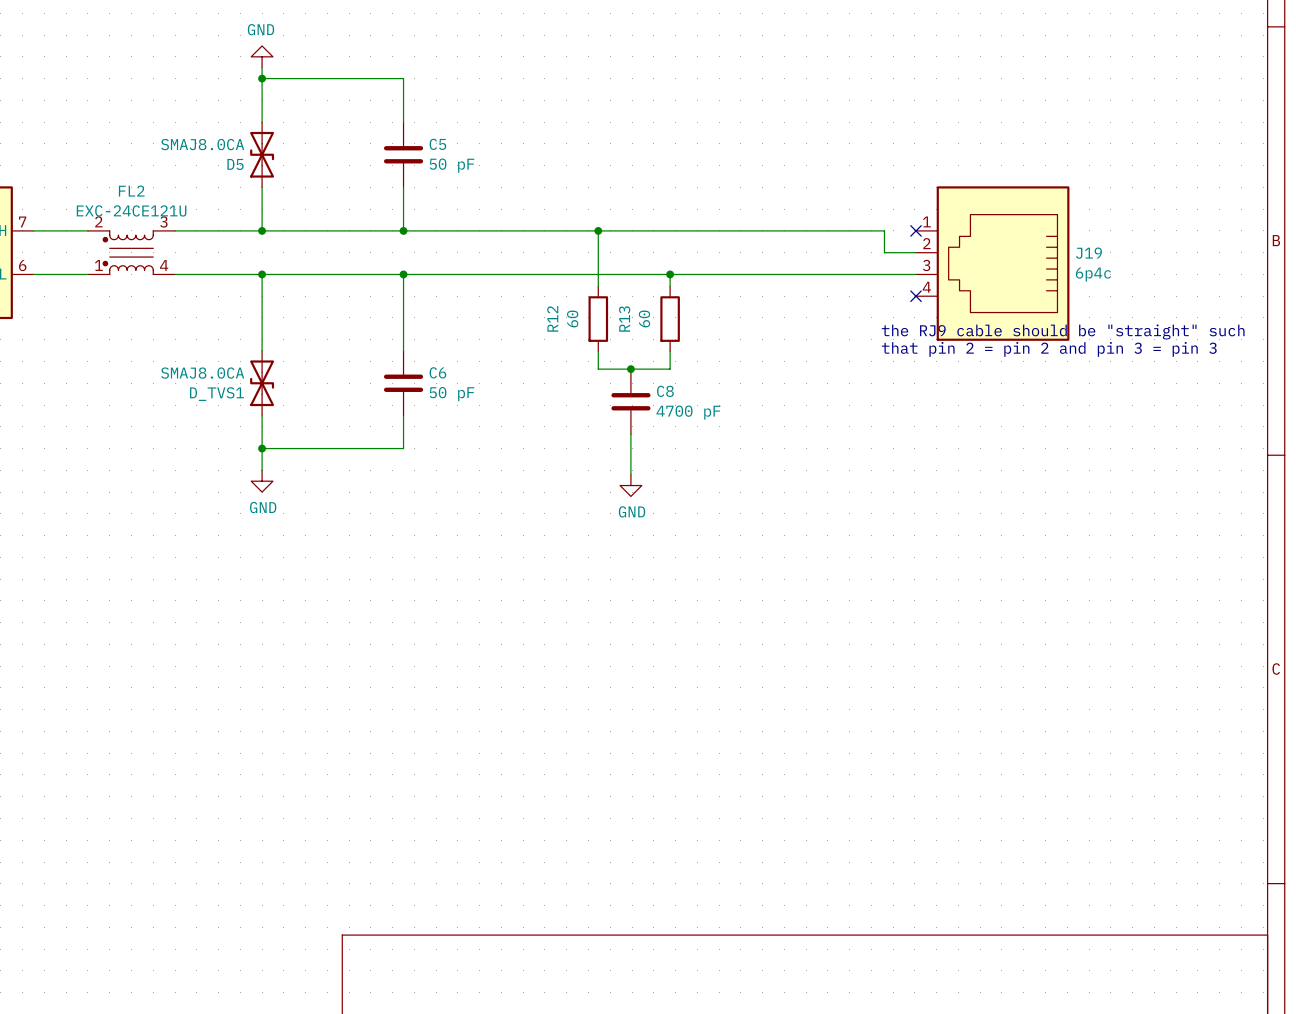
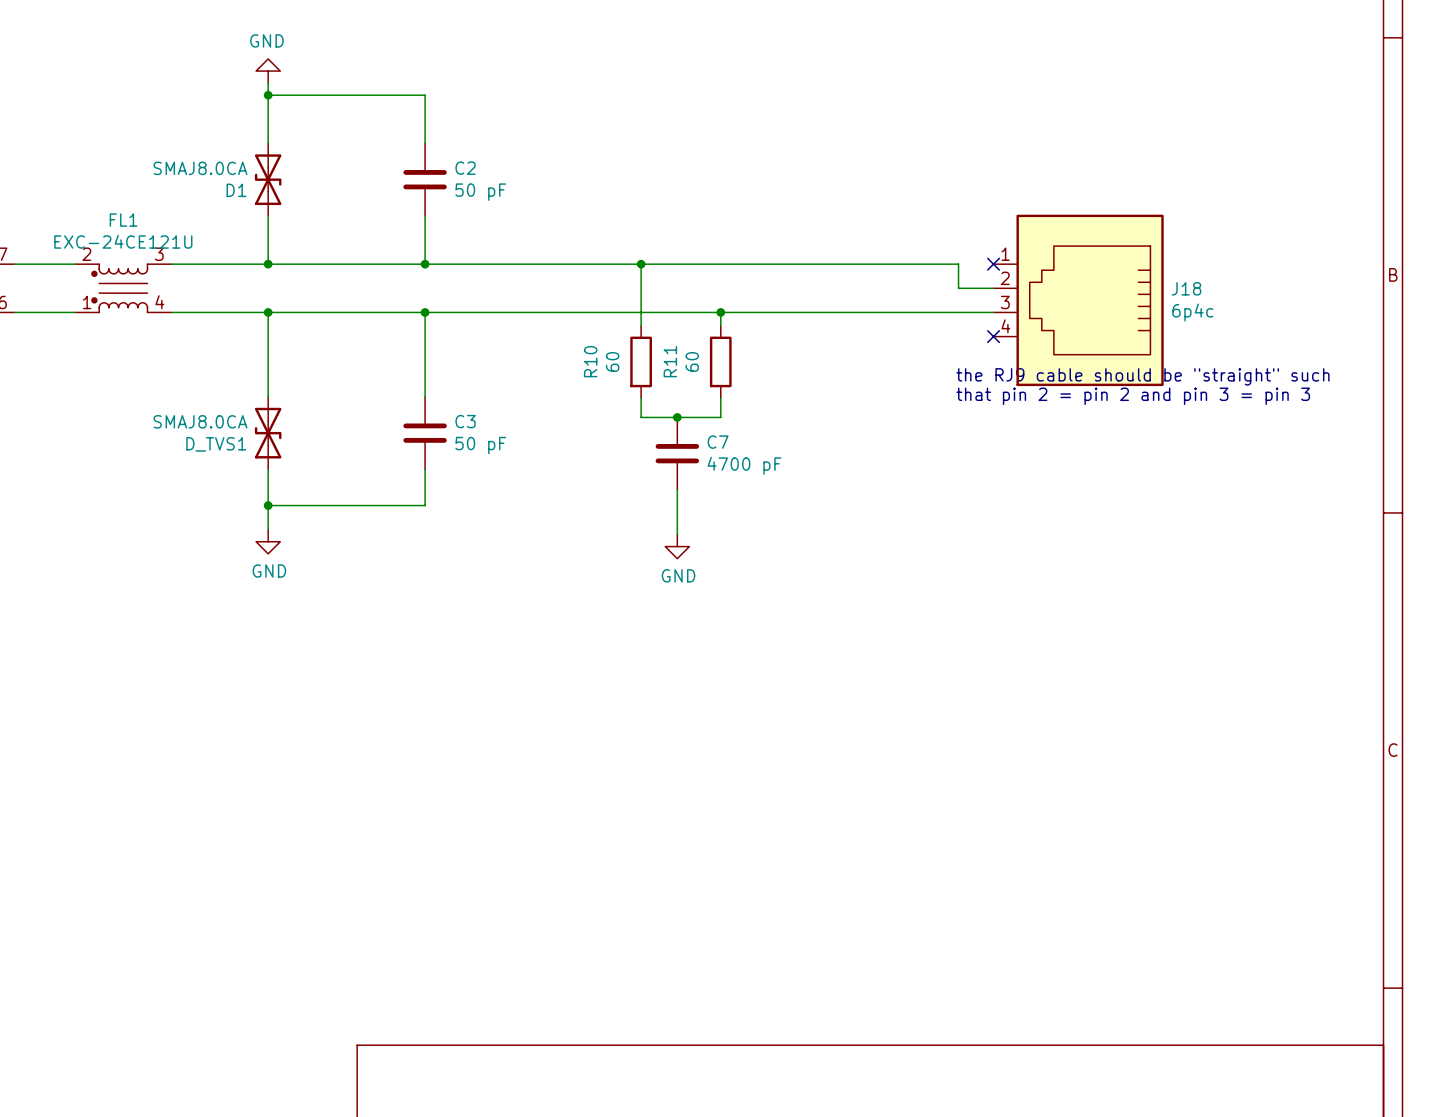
C5 name: C5 (437, 144) -> C2 (465, 168)
D5 name: D5 (235, 164) -> D1 (236, 190)
FL2 name: FL2 (131, 191) -> FL1 (123, 220)
J19 name: J19 (1088, 253) -> J18 (1186, 288)
R12 name: R12 (552, 318) -> R10 (590, 361)
R13 name: R13 (624, 319) -> R11 (670, 361)
C6 name: C6 (437, 372) -> C3 (465, 421)
C8 name: C8 (665, 391) -> C7 (718, 442)

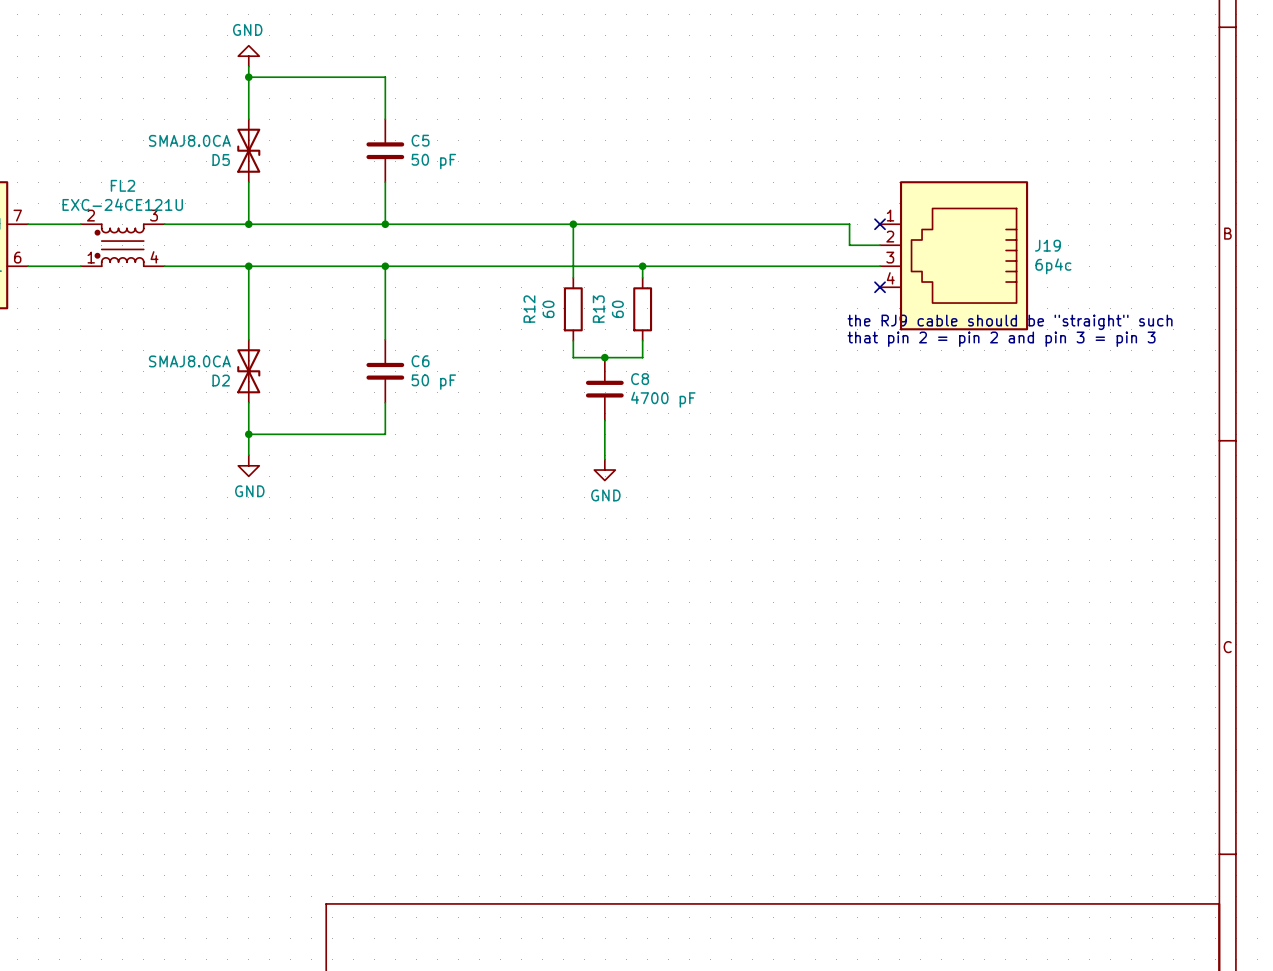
C2 name: C2 (465, 168) -> C5 (420, 140)
D1 name: D1 (236, 190) -> D5 (221, 159)
FL1 name: FL1 (123, 220) -> FL2 (122, 185)
J18 name: J18 (1186, 288) -> J19 (1047, 245)
R10 name: R10 (590, 361) -> R12 (529, 309)
R11 name: R11 (670, 361) -> R13 (598, 309)
C3 name: C3 (465, 421) -> C6 (420, 361)
C7 name: C7 (718, 442) -> C8 (640, 379)
D_TVS1 name: D_TVS1 (216, 444) -> D2 (221, 380)

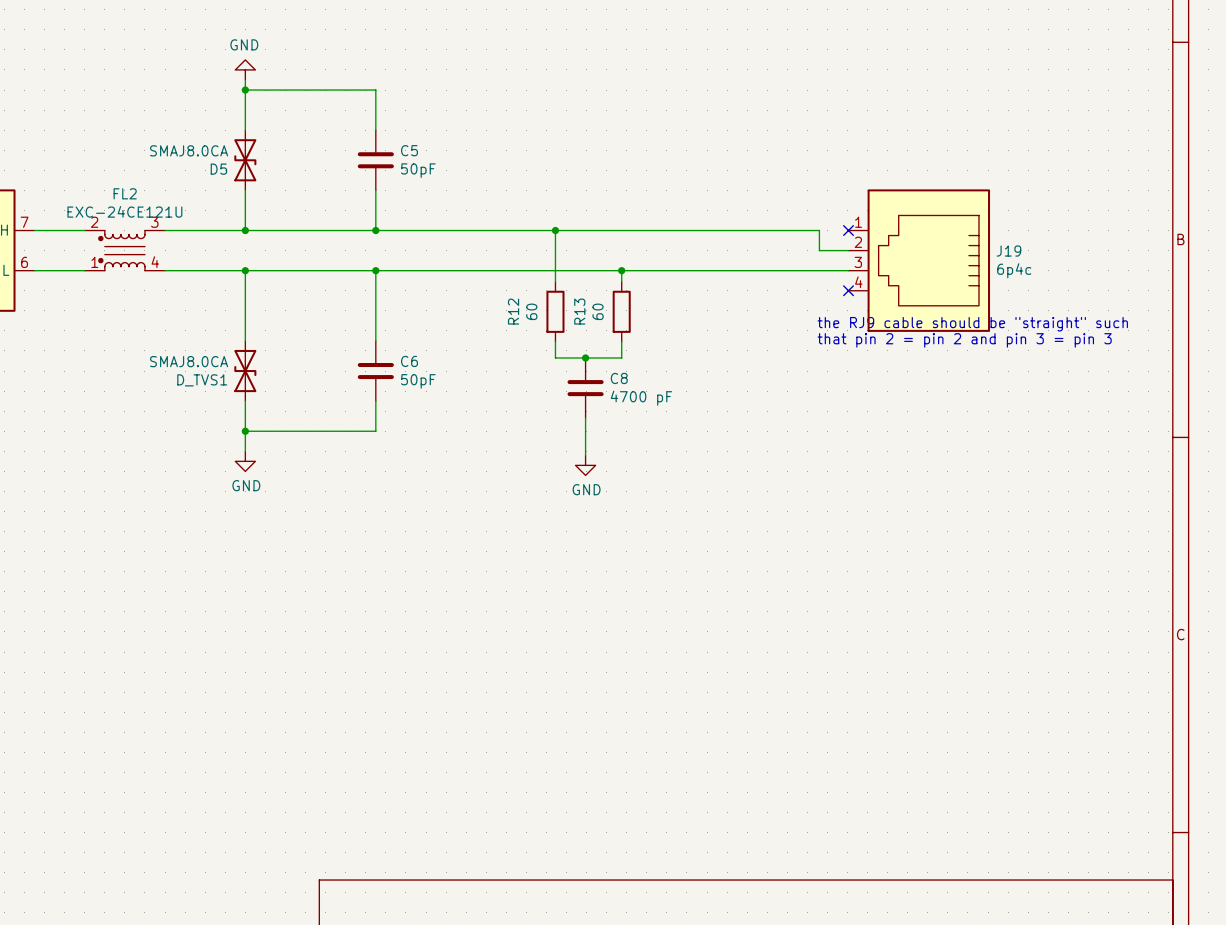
C5 value: 50 pF (433, 161) -> 50pF (418, 170)
D2 name: D2 (221, 380) -> D_TVS1 (202, 380)
C6 value: 50 pF (433, 382) -> 50pF (418, 381)

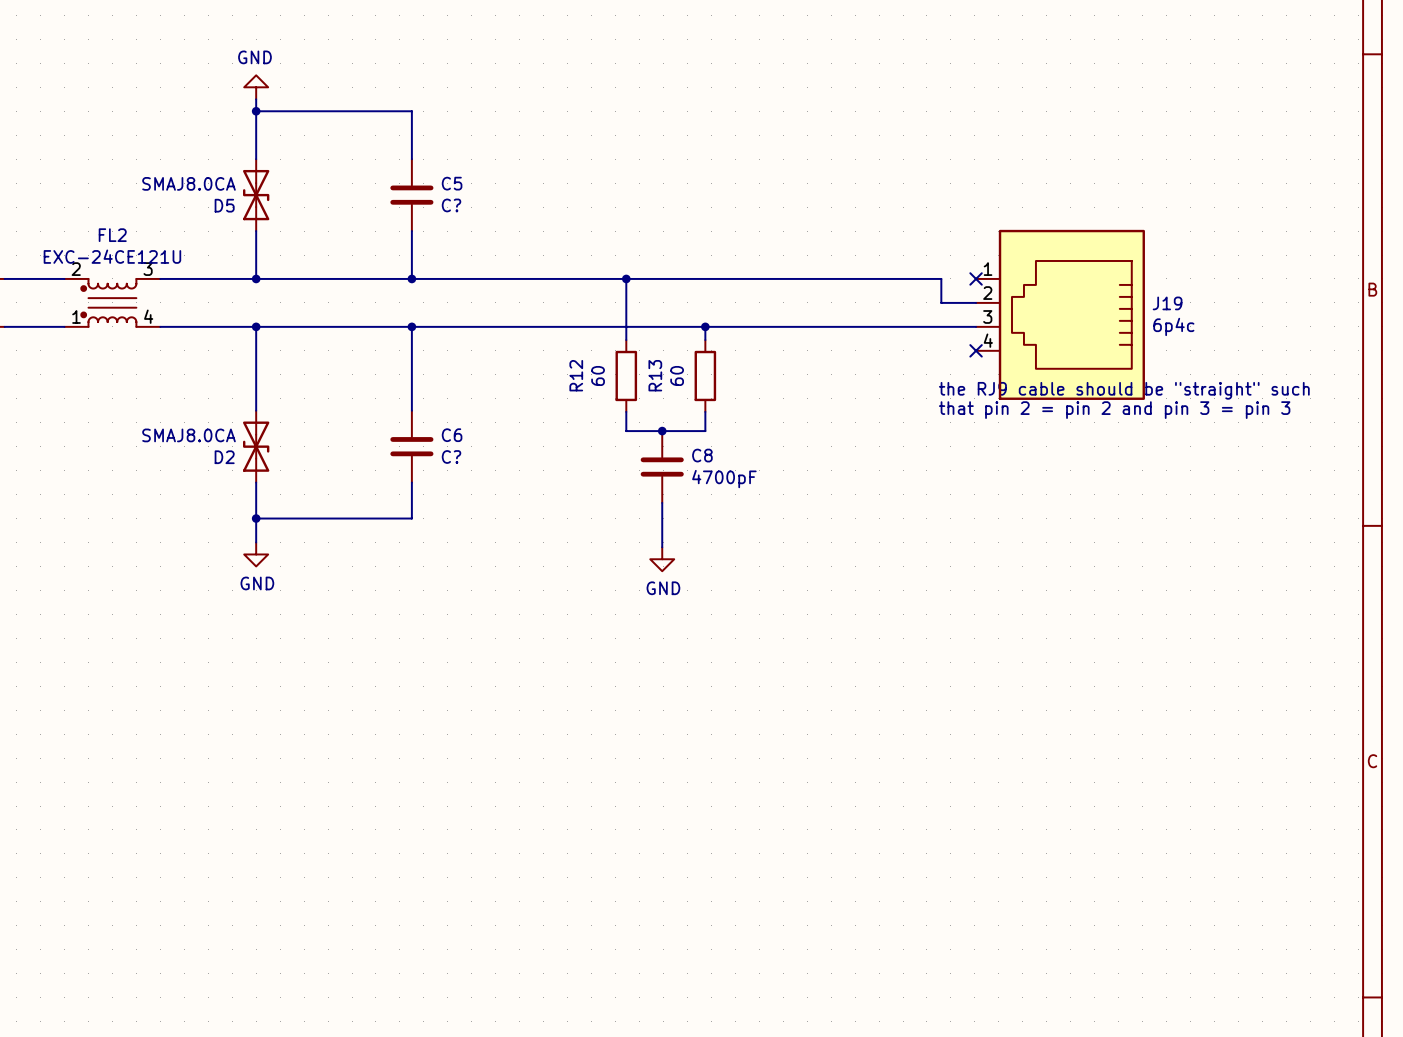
C5 value: 50pF (418, 170) -> C? (451, 205)
D_TVS1 name: D_TVS1 (202, 380) -> D2 (224, 457)
C6 value: 50pF (418, 381) -> C? (451, 456)
C8 value: 4700 pF (641, 398) -> 4700pF (724, 479)

